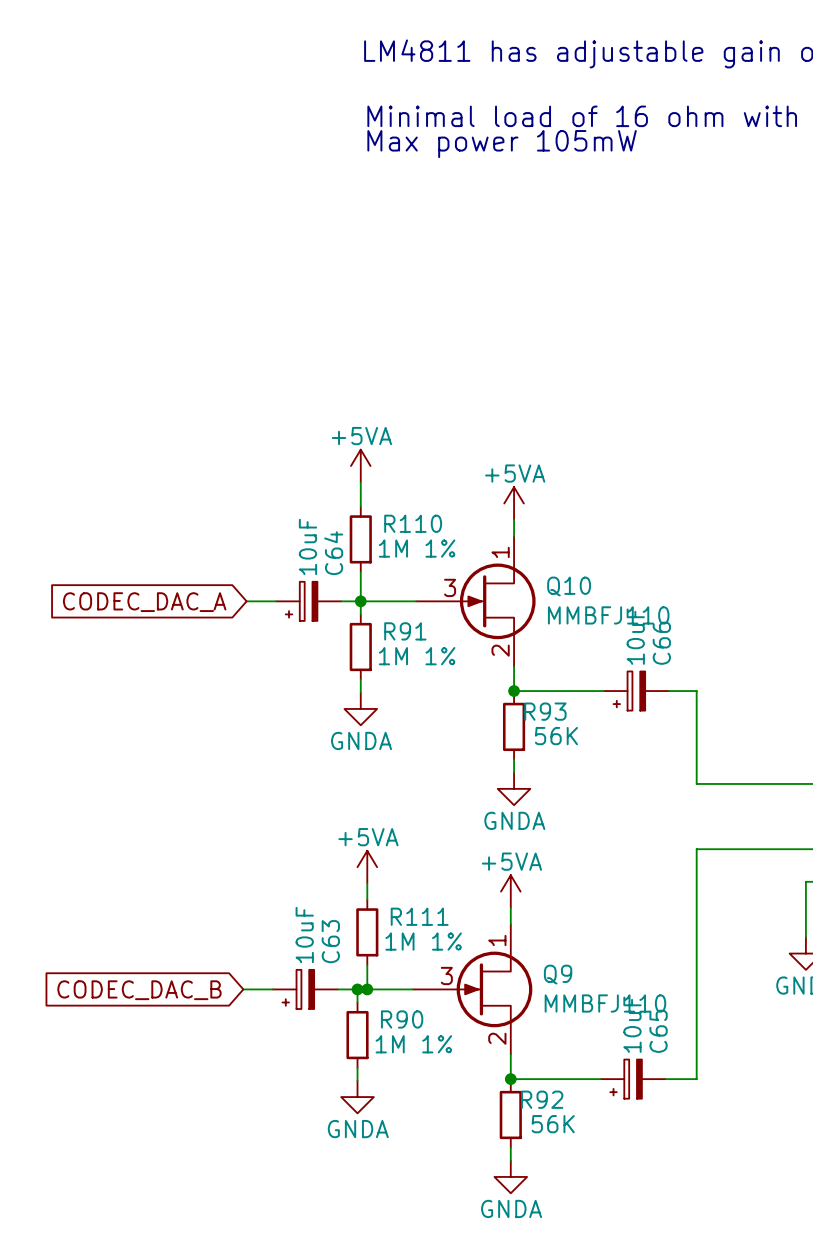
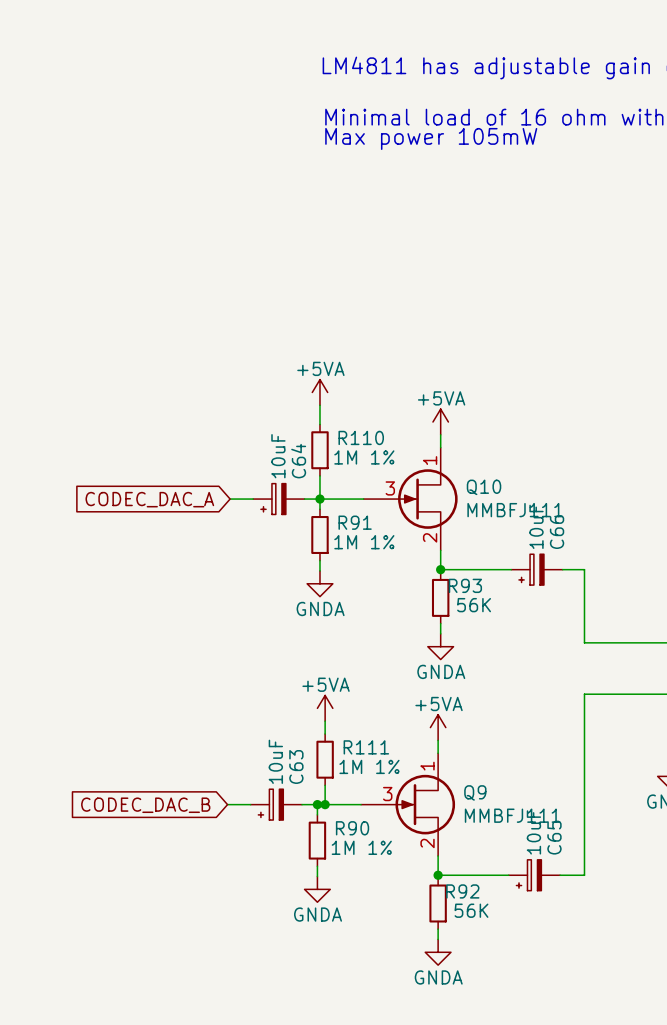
Q10 value: MMBFJ110 (608, 615) -> MMBFJ111 (515, 510)
Q9 value: MMBFJ110 (605, 1003) -> MMBFJ111 (512, 815)

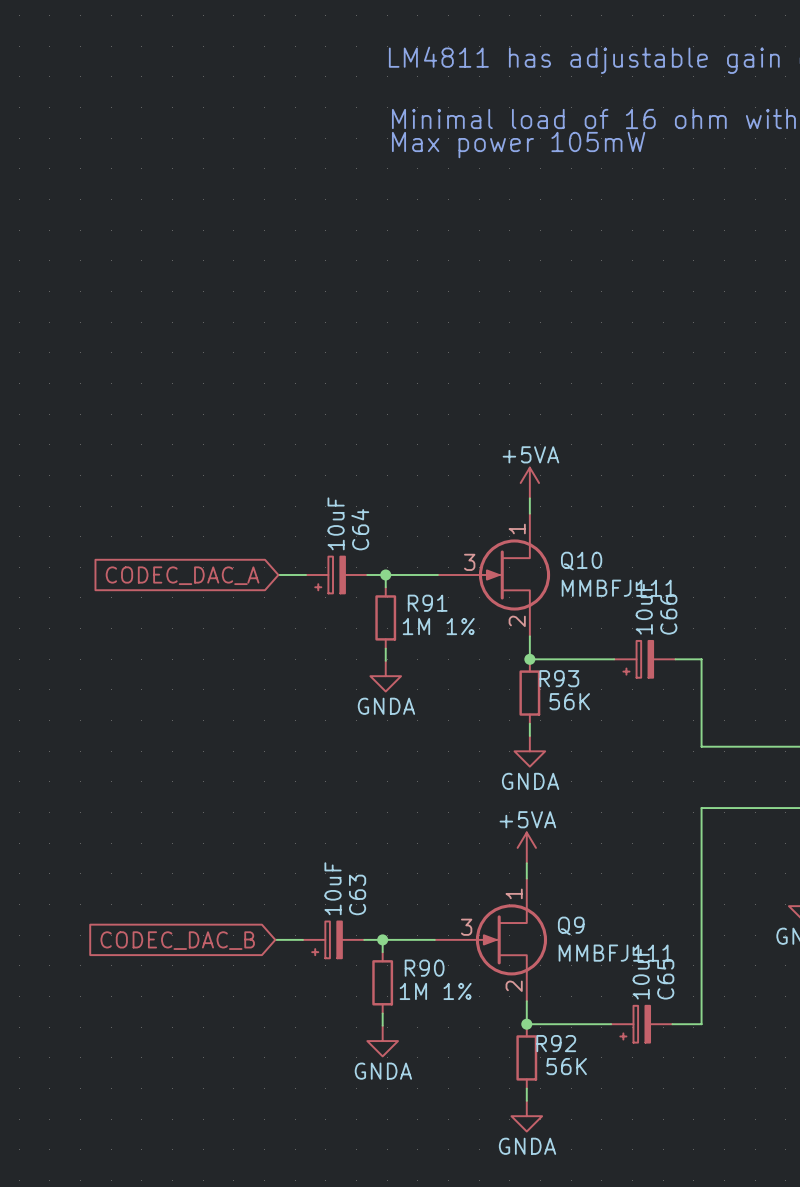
power symbol: +5VA (319, 392) -> none
wire: (319, 405) (319, 424) -> none
R110: 1M 1% (319, 450) -> none
wire: (319, 475) (319, 499) -> none
power symbol: +5VA (325, 708) -> none
wire: (325, 721) (325, 734) -> none
R111: 1M 1% (325, 759) -> none
wire: (325, 785) (325, 804) -> none
junction: (325, 804) -> none

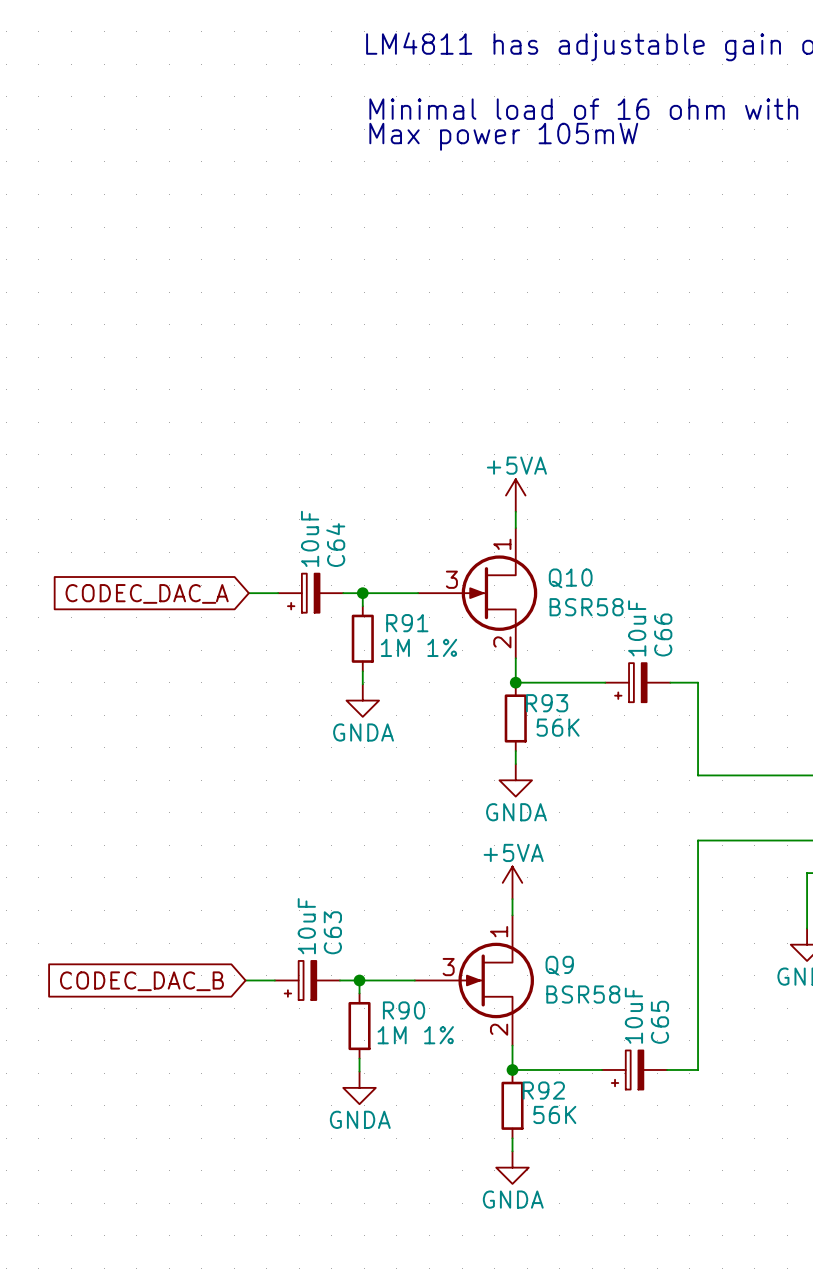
Q10 value: MMBFJ111 (618, 588) -> BSR58 (586, 607)
Q9 value: MMBFJ111 (615, 953) -> BSR58 (583, 994)

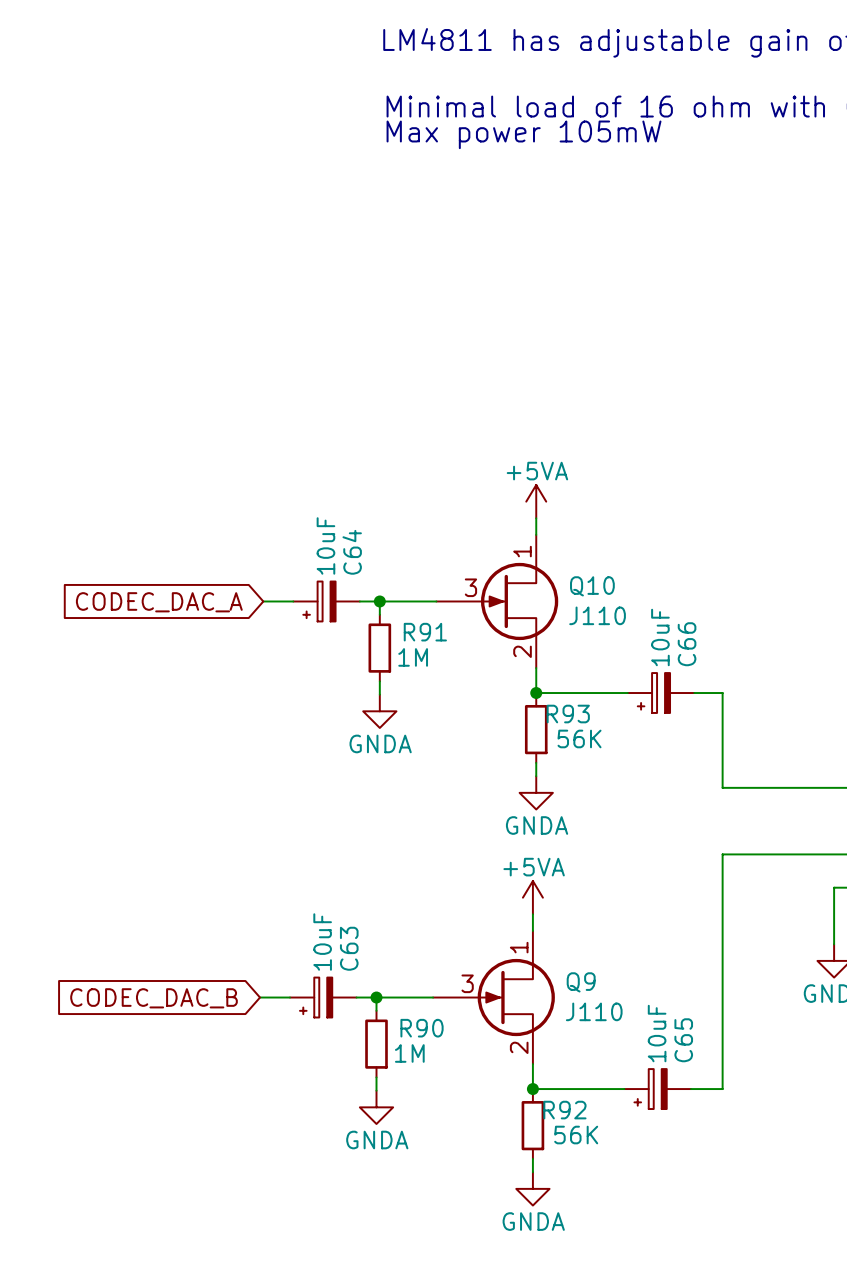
Q10 value: BSR58 (586, 607) -> J110 (597, 615)
R91 value: 1M 1% (419, 647) -> 1M (413, 657)
Q9 value: BSR58 (583, 994) -> J110 (594, 1011)
R90 value: 1M 1% (415, 1035) -> 1M (409, 1053)

